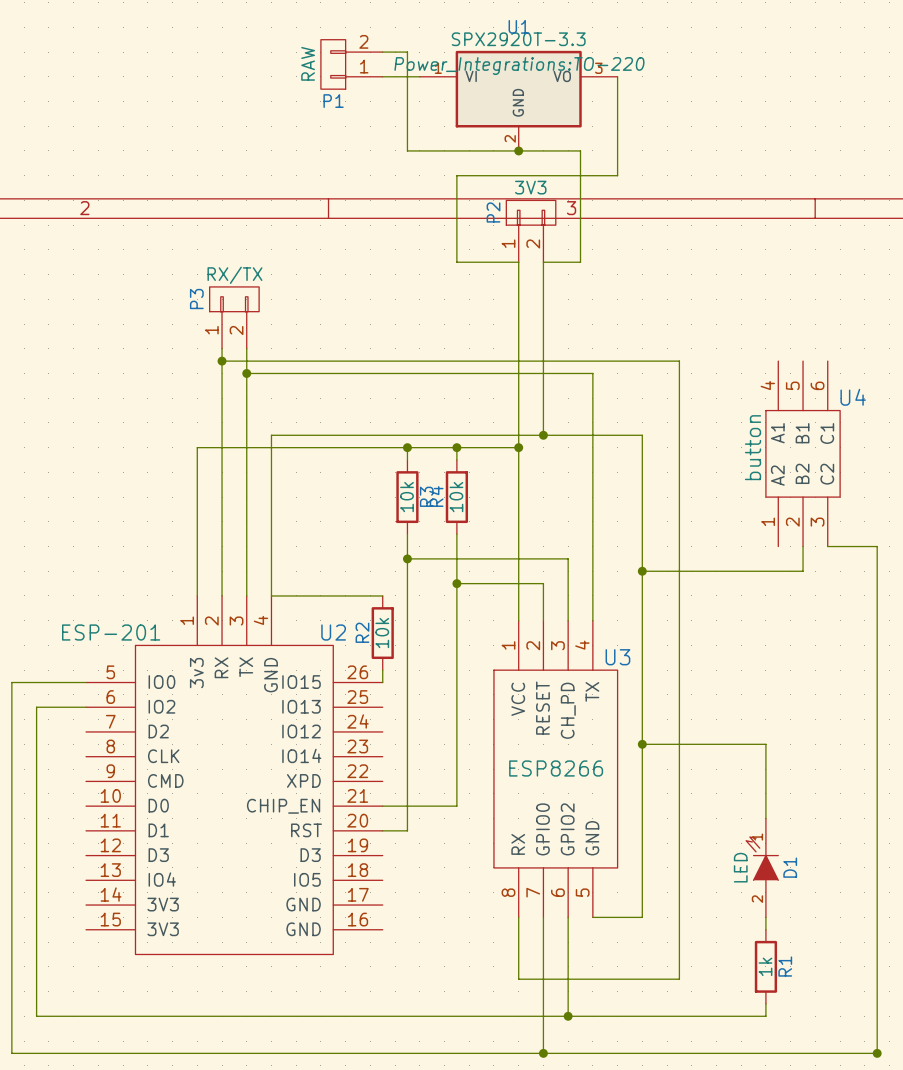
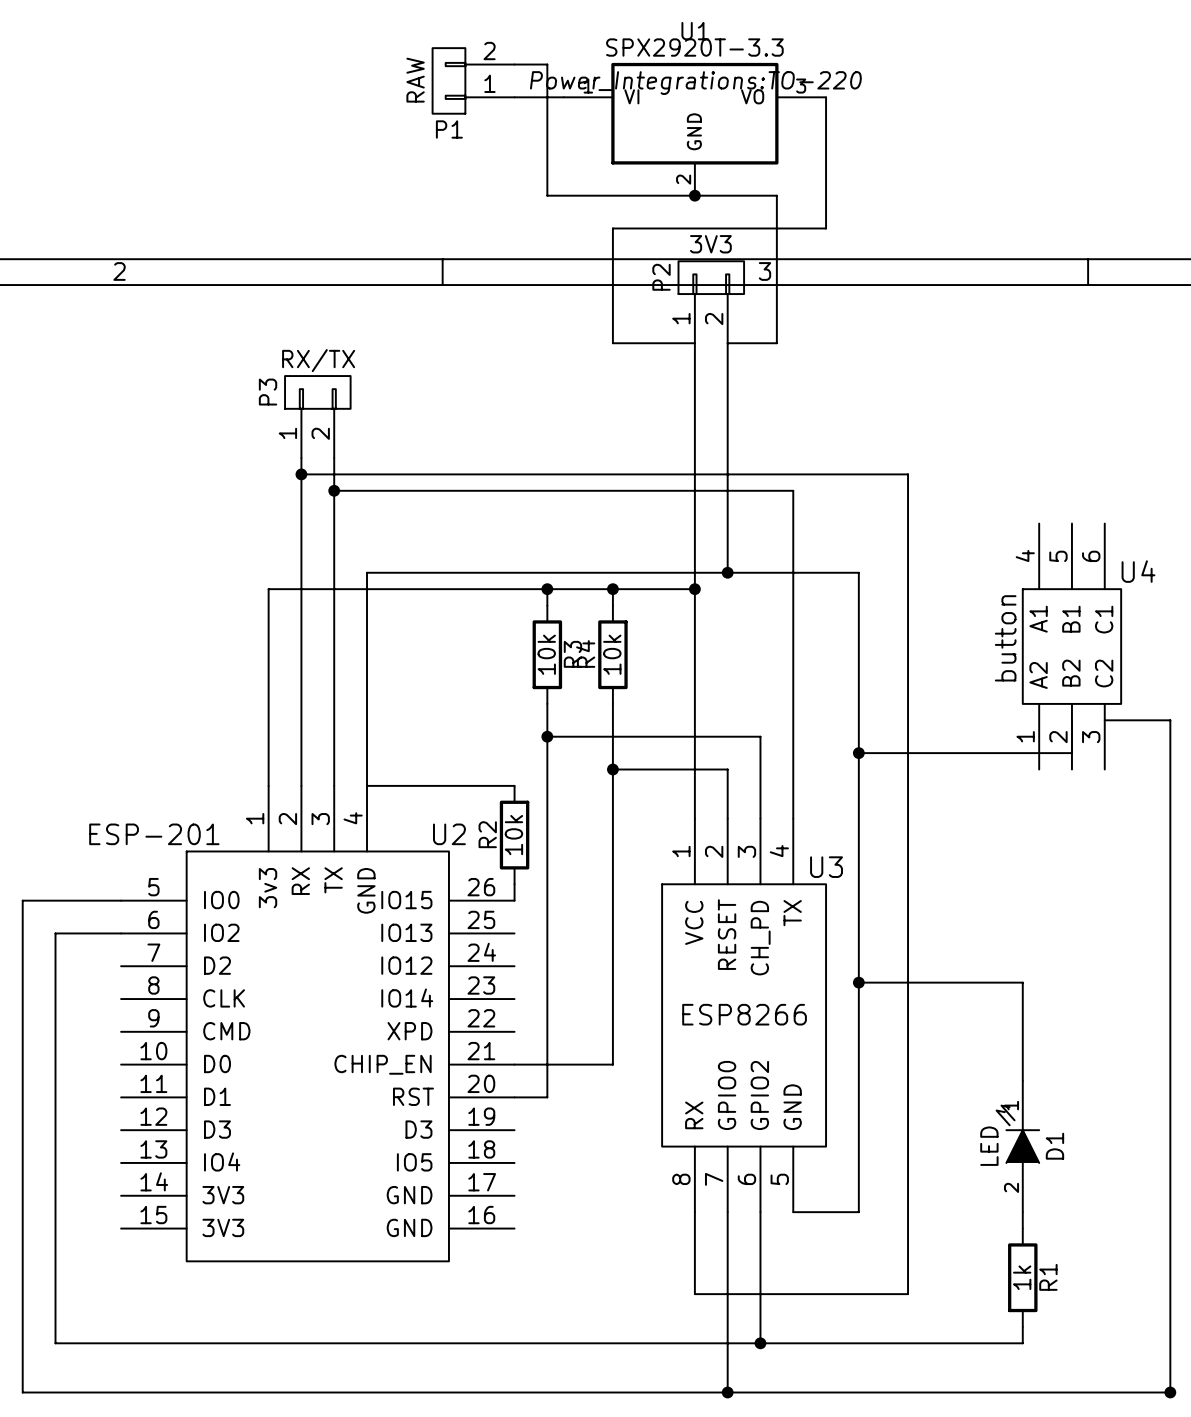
U4 position: (803, 453) -> (1071, 646)

